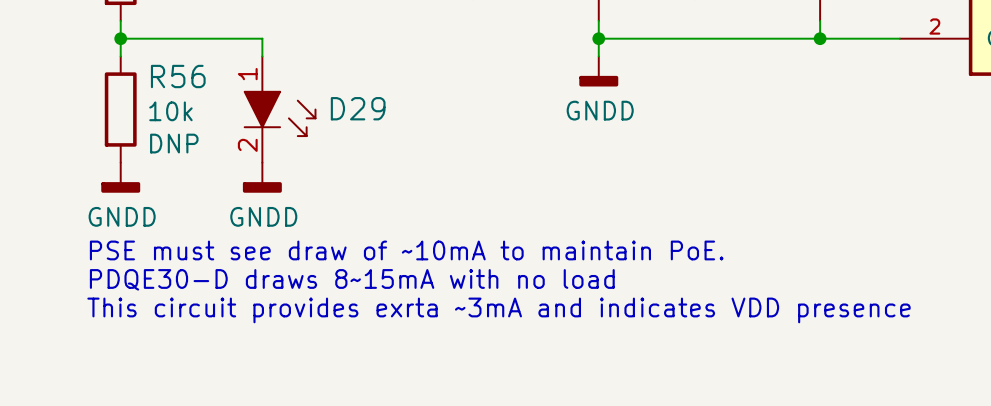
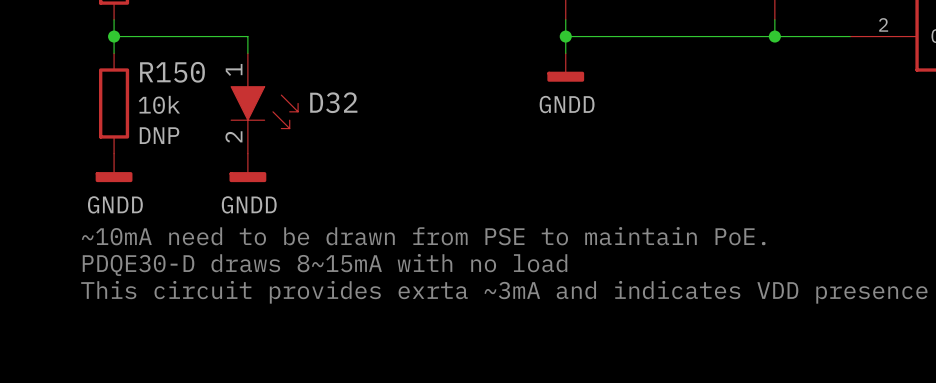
R56 name: R56 (178, 76) -> R150 (172, 72)
D29 name: D29 (358, 108) -> D32 (333, 102)
text: PSE must see draw of ~10mA to maintain PoE. (406, 250) -> ~10mA need to be drawn from PSE to maintain PoE. (423, 236)

